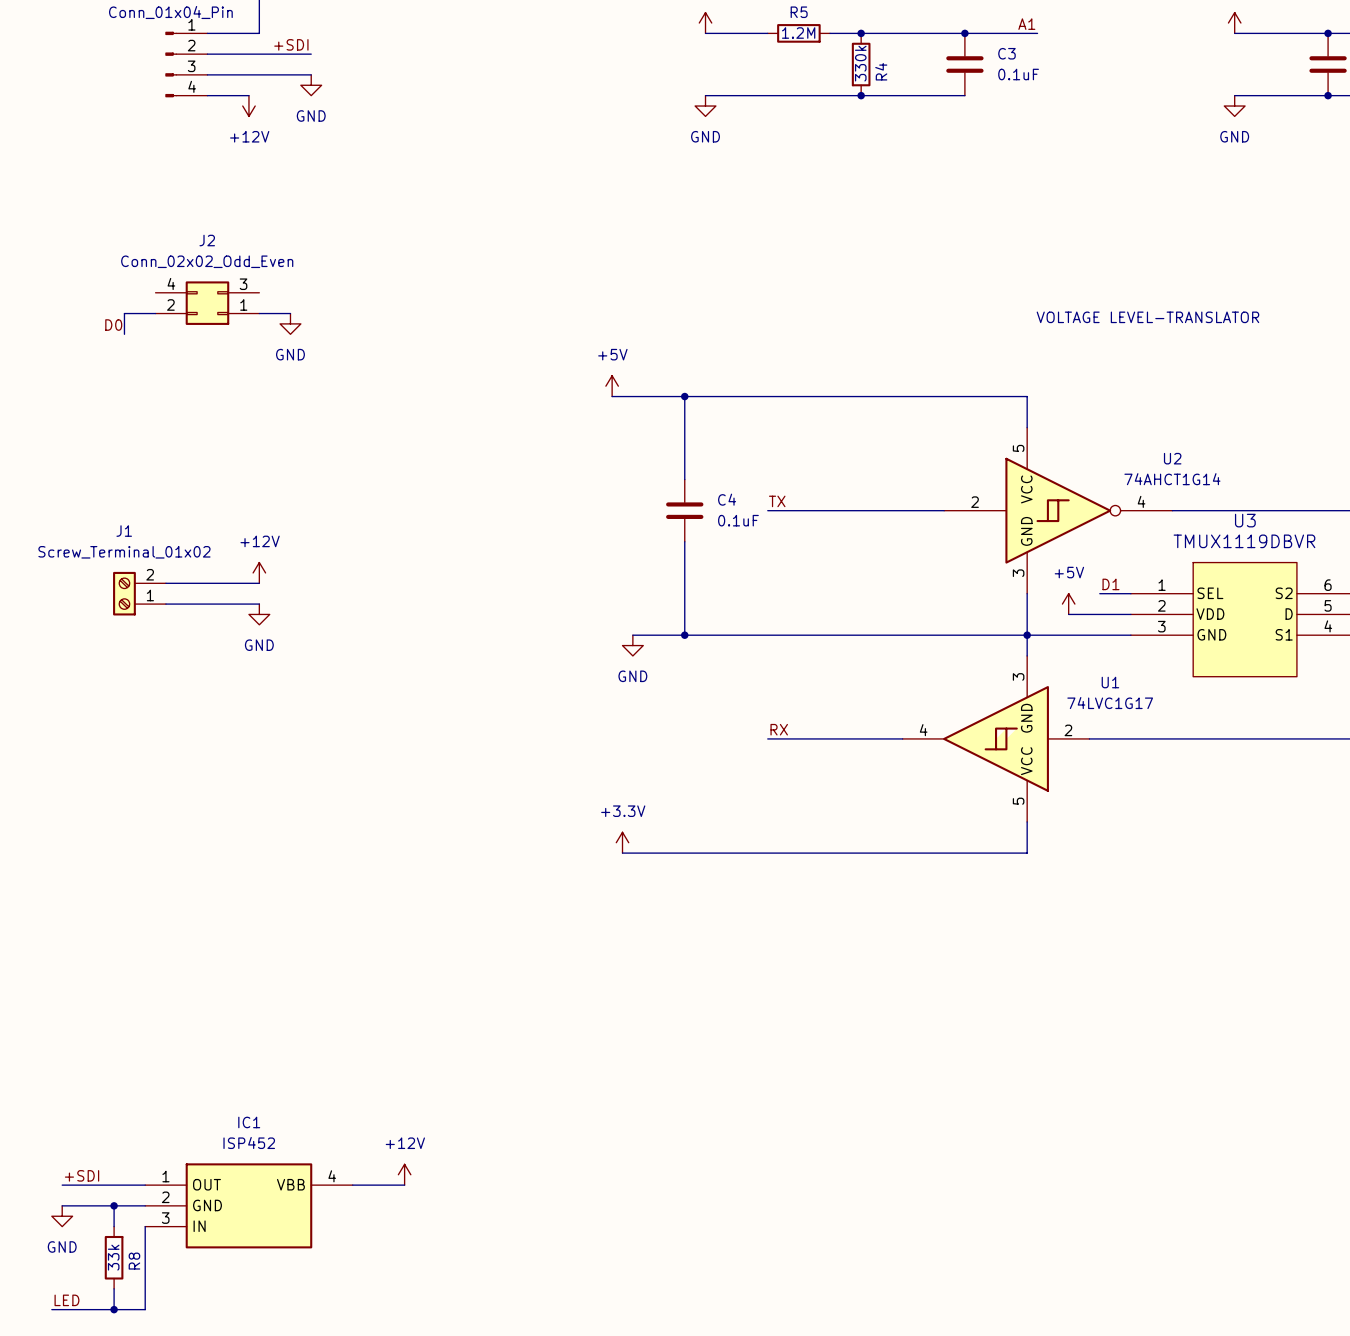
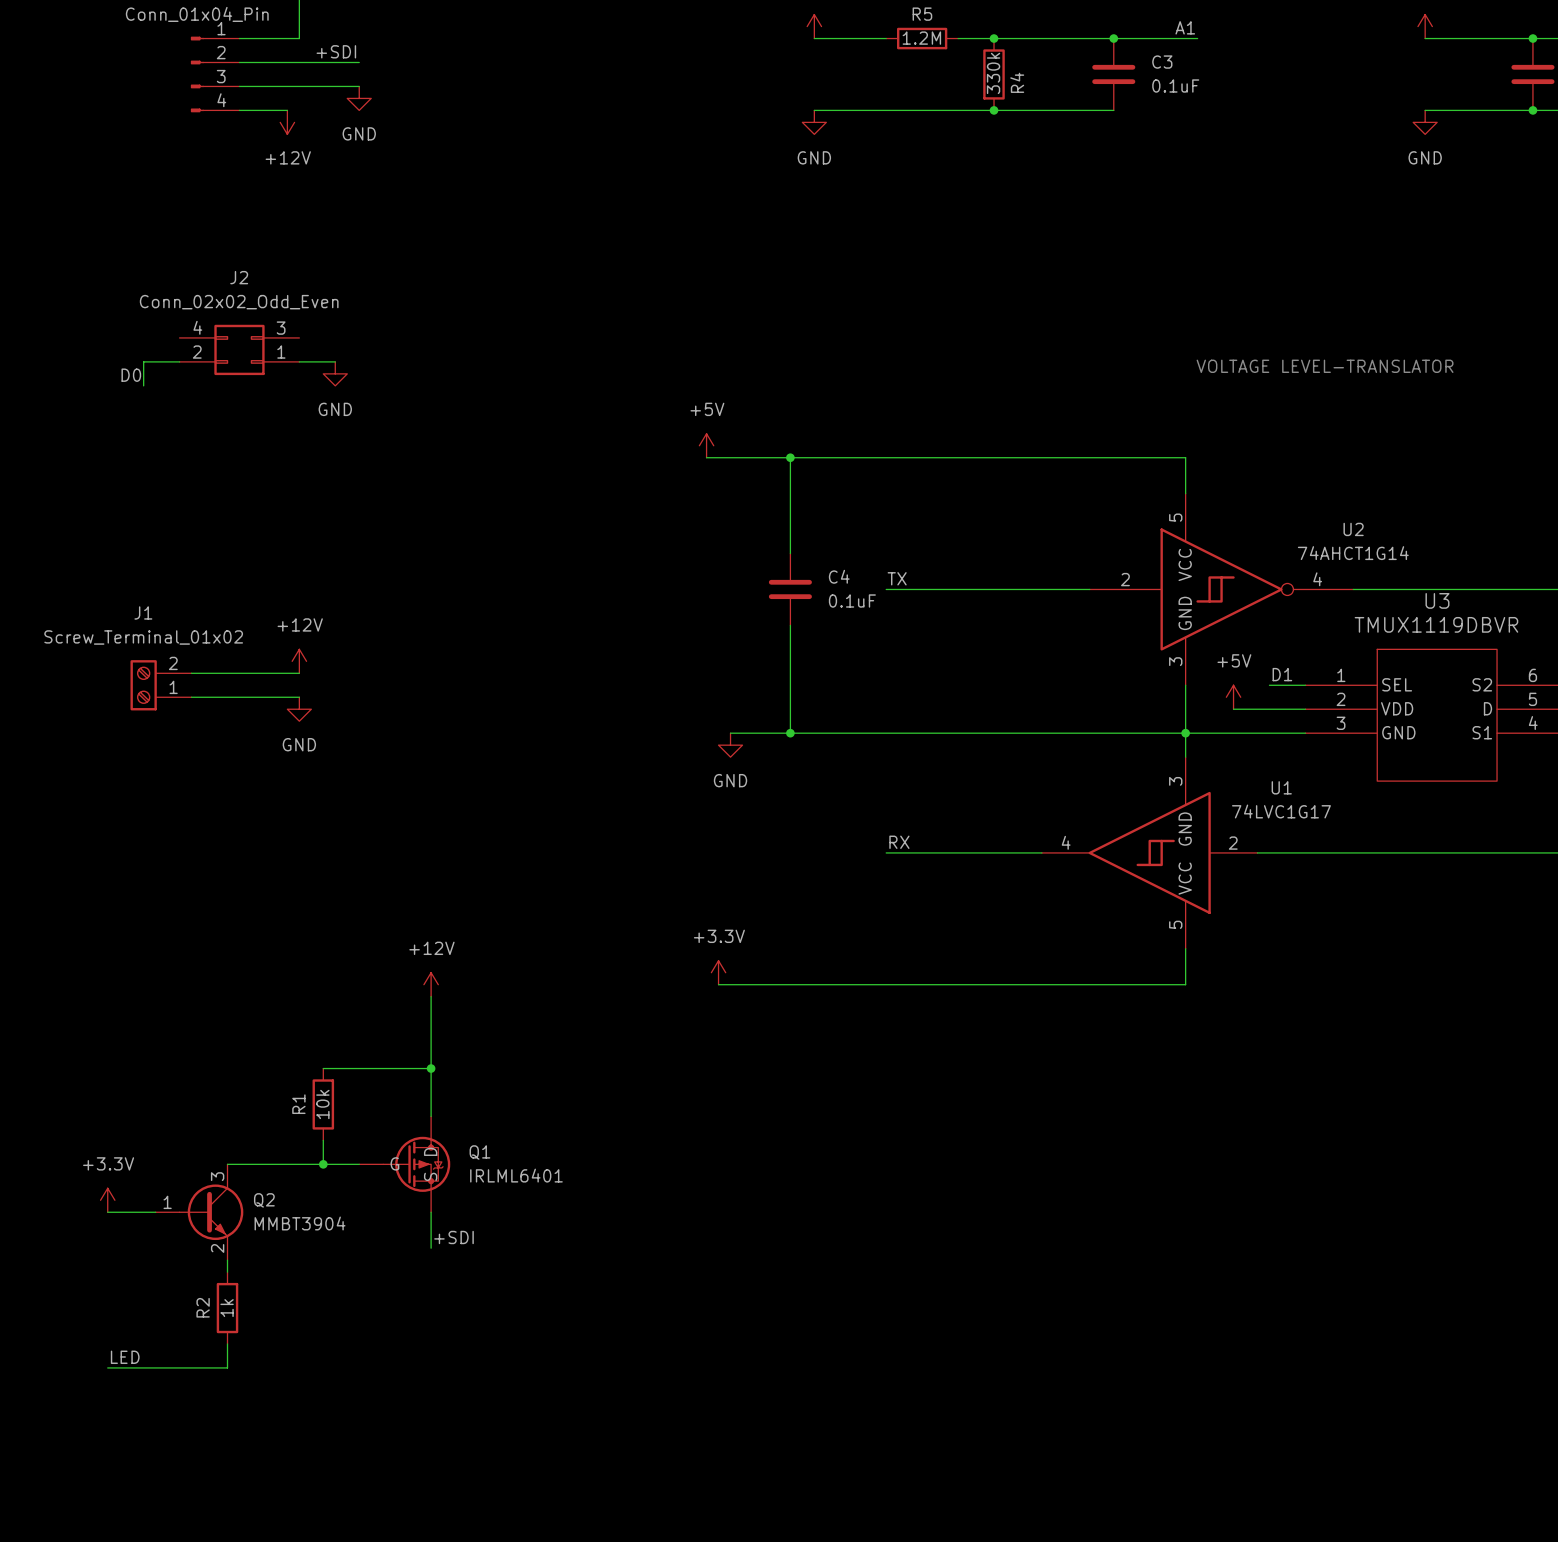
power symbol: none -> +12V (431, 984)
wire: none -> (431, 996) (431, 1116)
wire: none -> (323, 1068) (431, 1068)
junction: none -> (431, 1068)
R1: none -> 10k (323, 1104)
wire: none -> (323, 1140) (323, 1164)
wire: none -> (227, 1164) (359, 1164)
junction: none -> (323, 1164)
Q1: none -> IRLML6401 (404, 1164)
power symbol: none -> +3.3V (107, 1200)
wire: none -> (107, 1212) (155, 1212)
Q2: none -> MMBT3904 (199, 1212)
wire: none -> (431, 1212) (431, 1248)
label: none -> +SDI (454, 1237)
wire: none -> (227, 1260) (227, 1272)
R2: none -> 1k (227, 1308)
power symbol: +12V (404, 1174) -> none
label: +SDI (82, 1175) -> none
wire: (62, 1185) (93, 1185) -> none
wire: (352, 1185) (404, 1185) -> none
wire: (62, 1205) (145, 1205) -> none
wire: (114, 1205) (114, 1226) -> none
junction: (114, 1205) -> none
IC1: ISP452 (248, 1205) -> none
power symbol: GND (62, 1216) -> none
wire: (145, 1226) (145, 1309) (51, 1309) -> none
R8: 33k (114, 1257) -> none
wire: (114, 1288) (114, 1309) -> none
label position: LED (66, 1300) -> LED (125, 1357)
junction: (114, 1309) -> none

